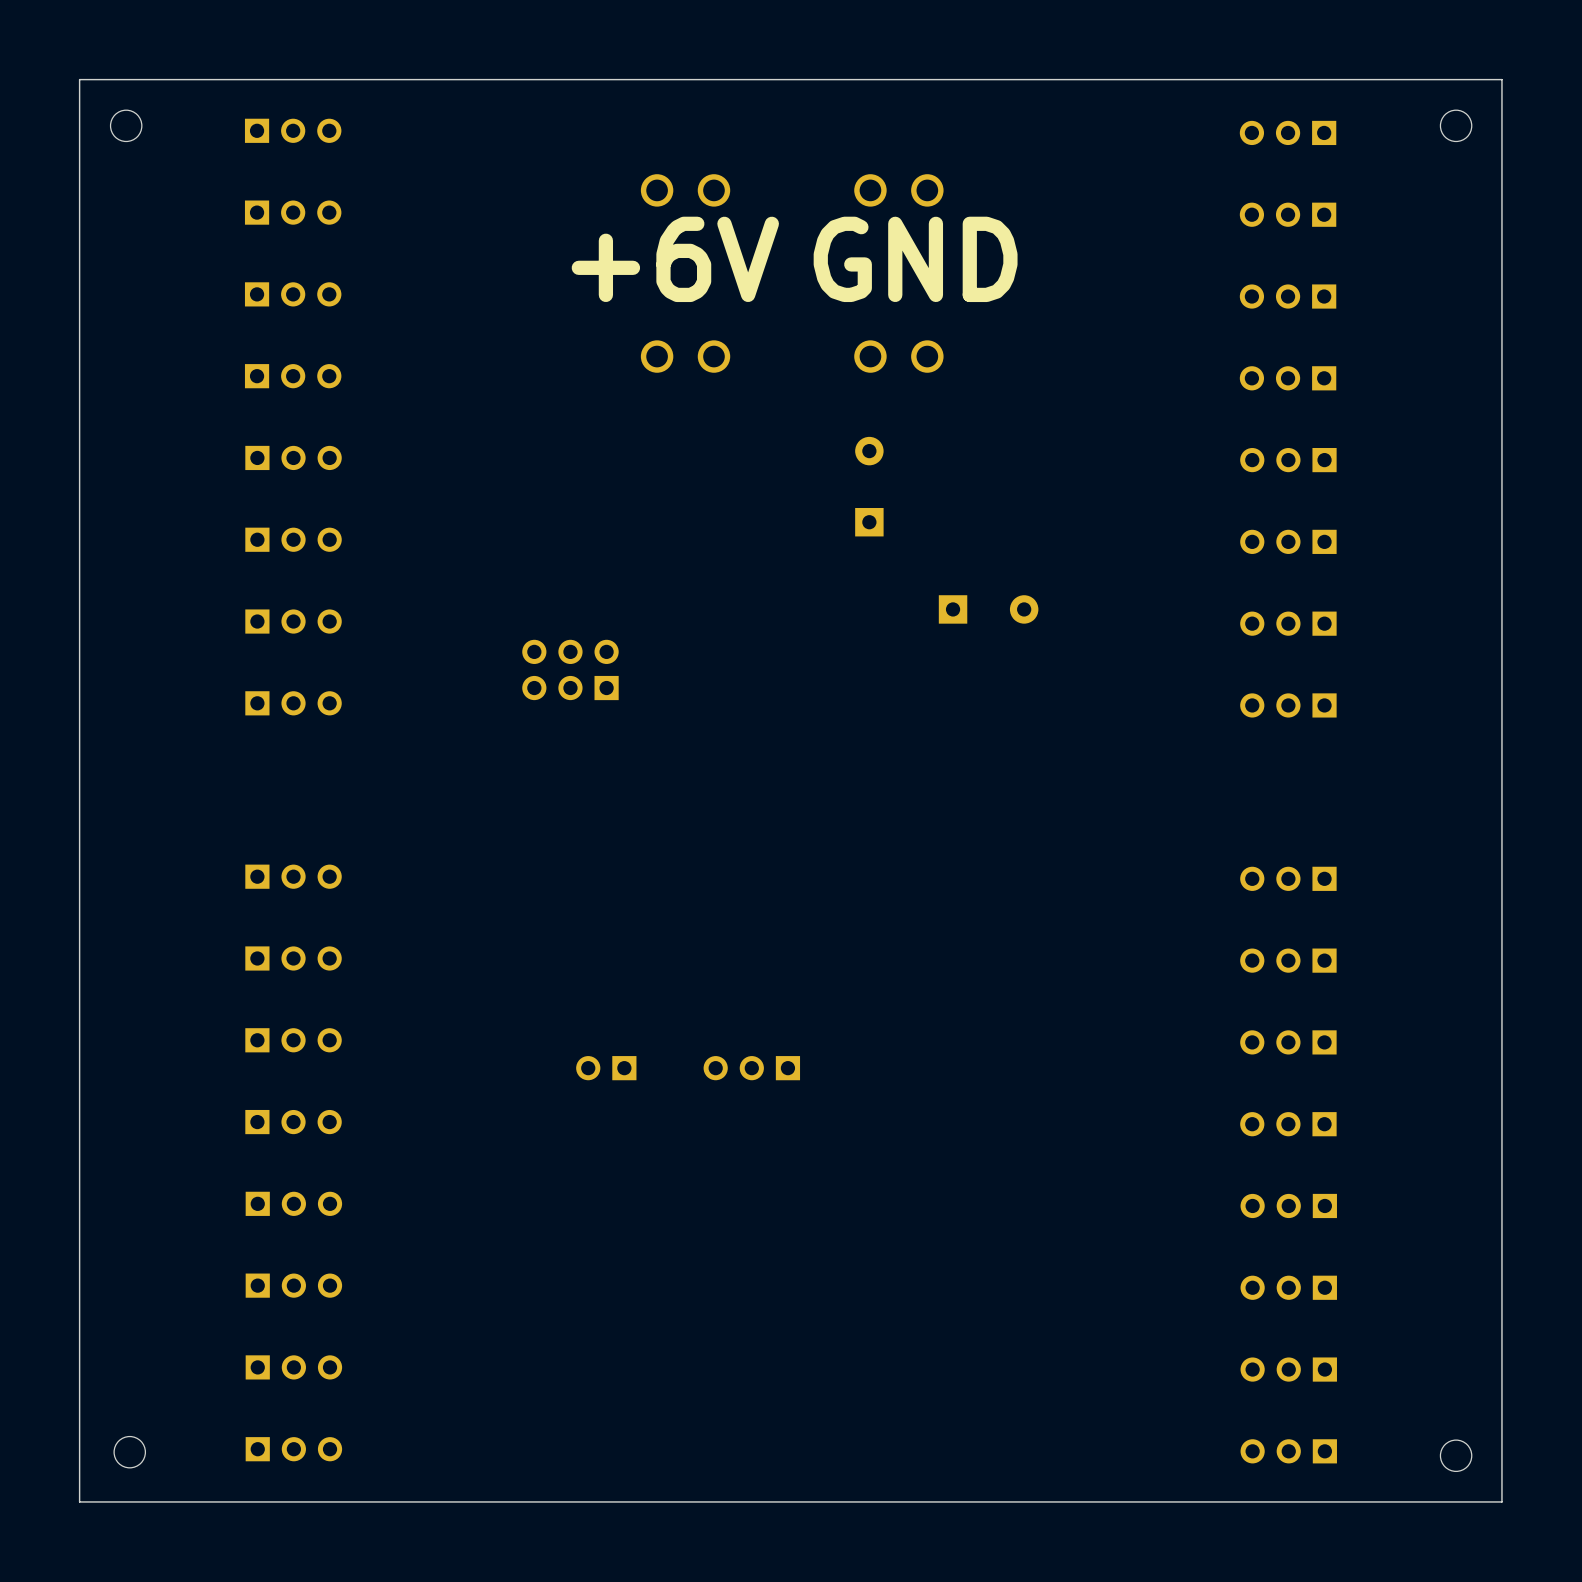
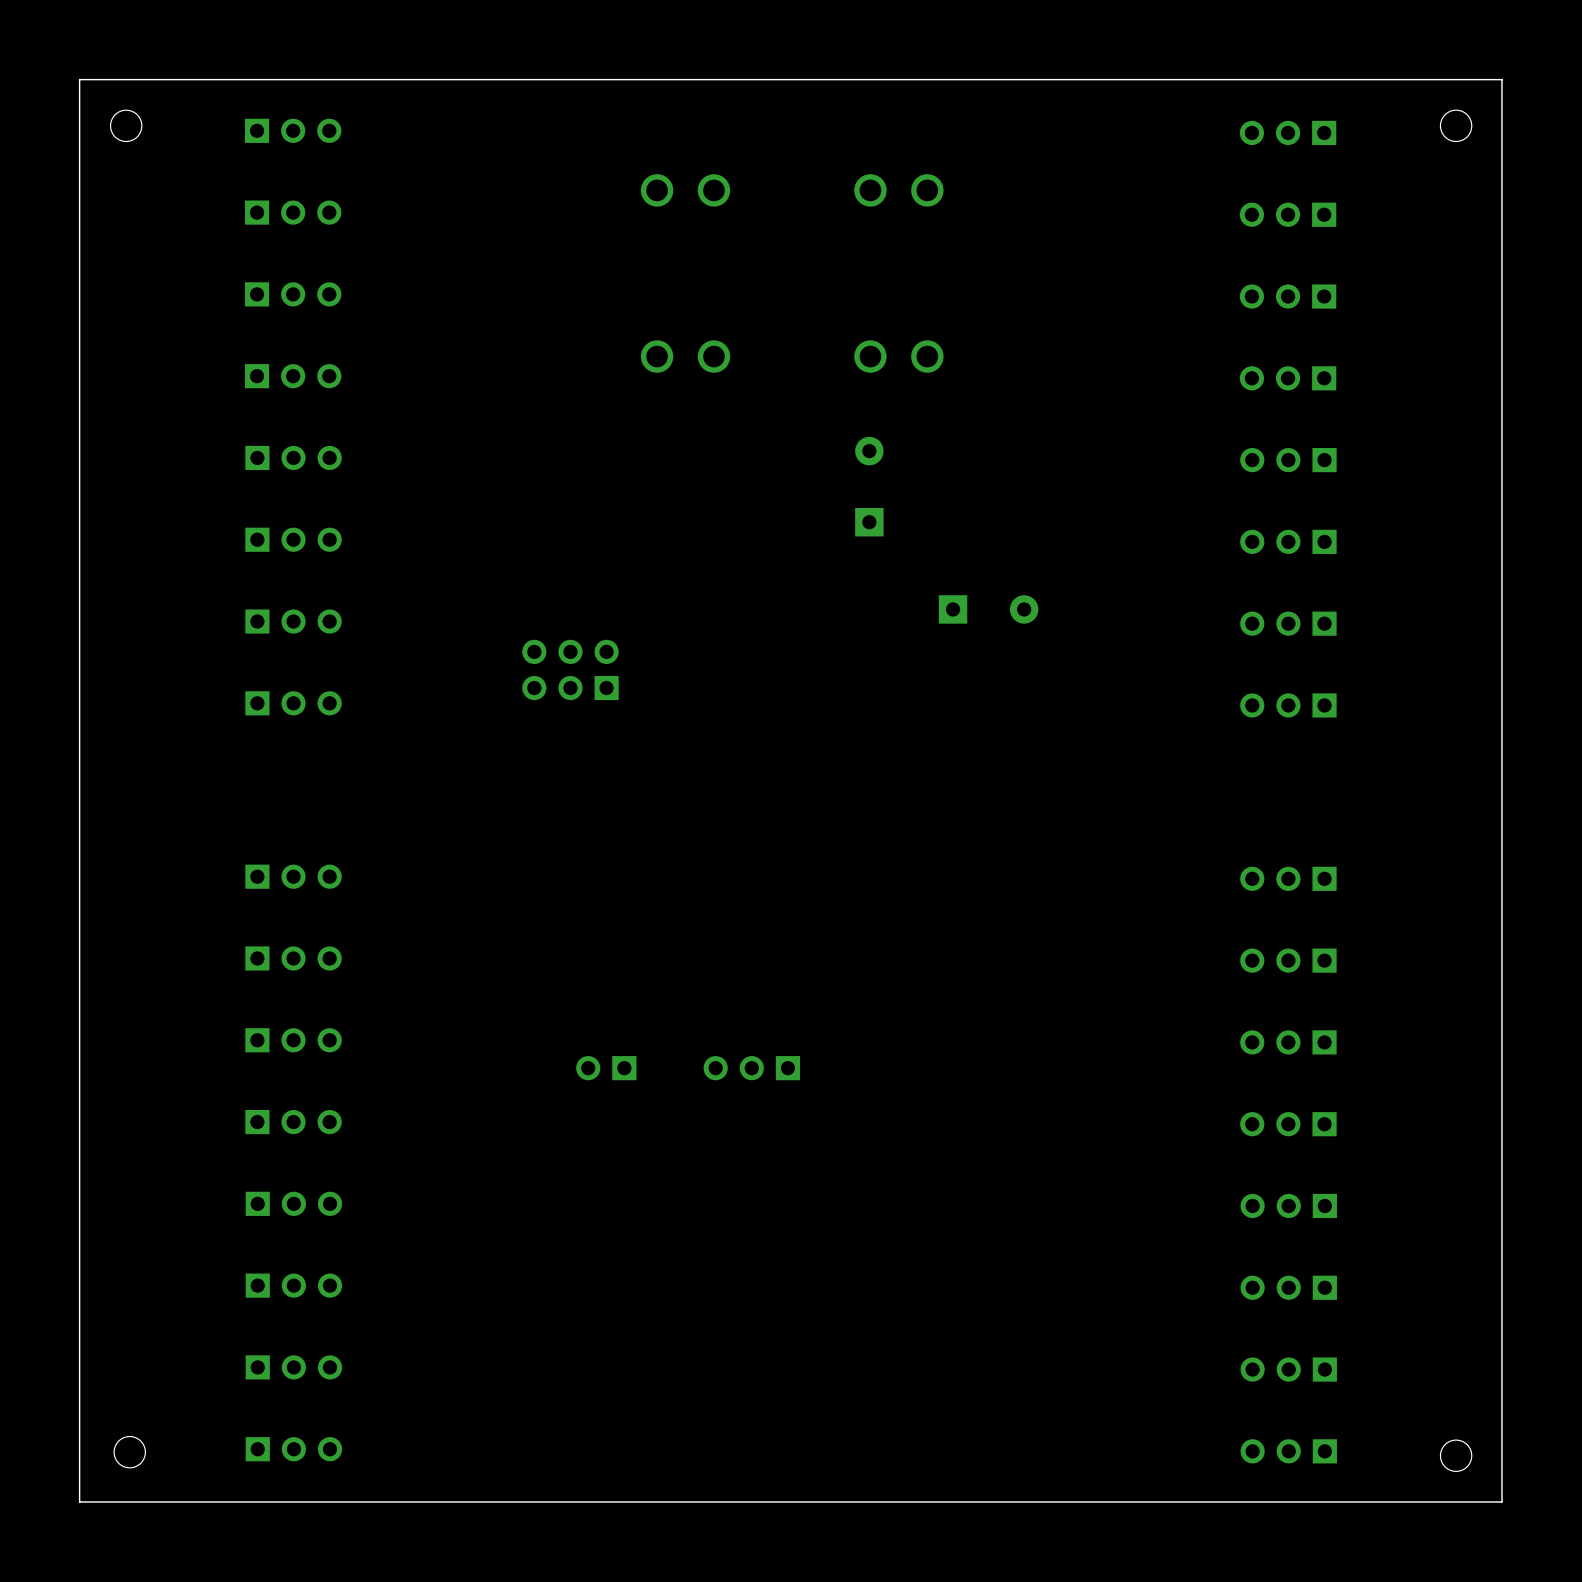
text: +6V (675, 259) -> none
text: GND (915, 259) -> none

